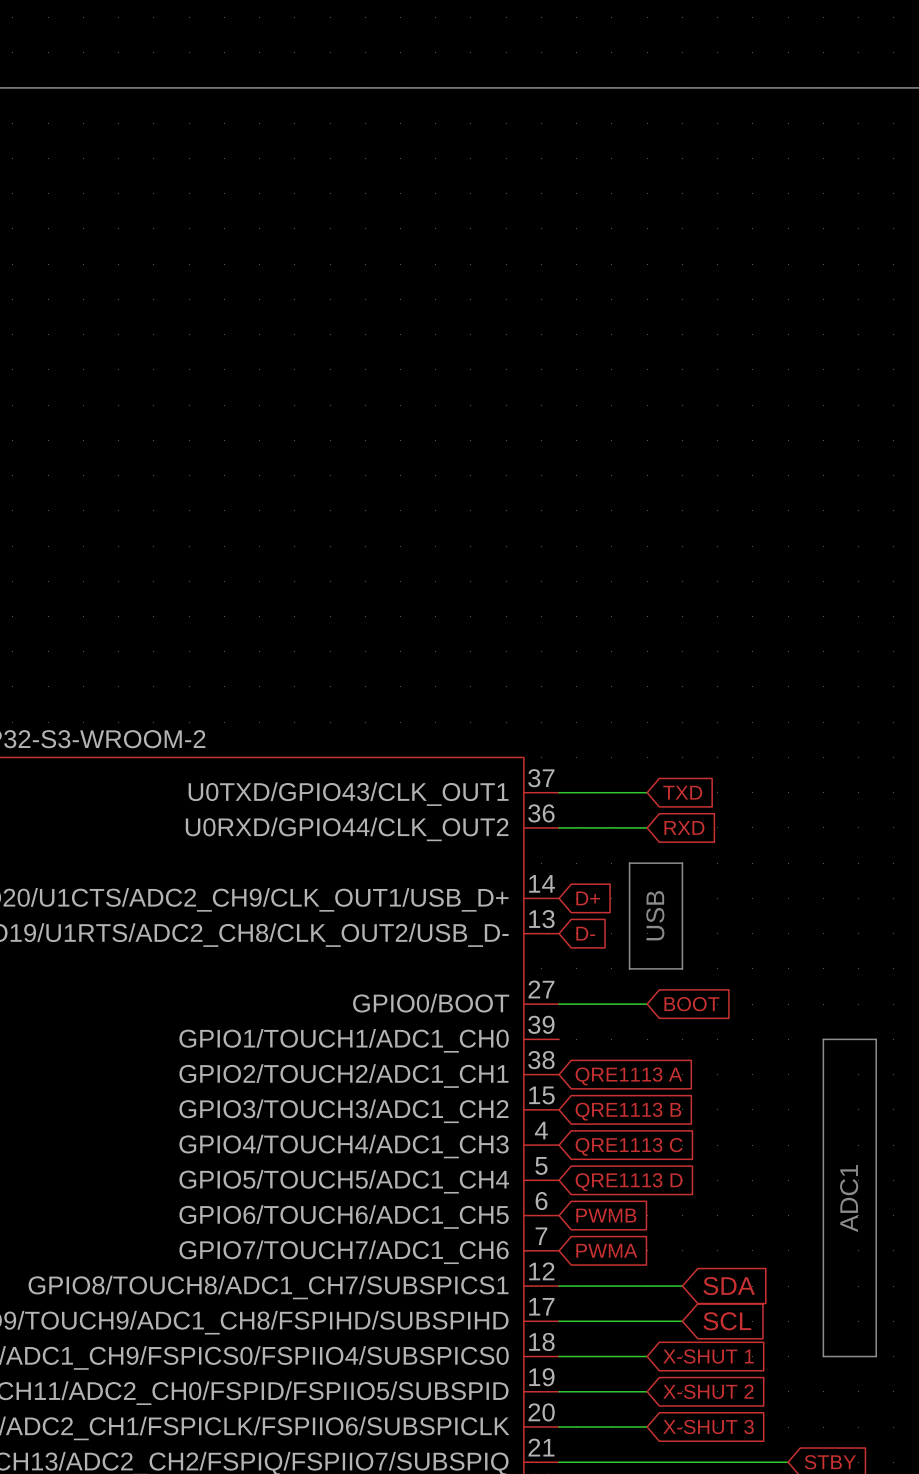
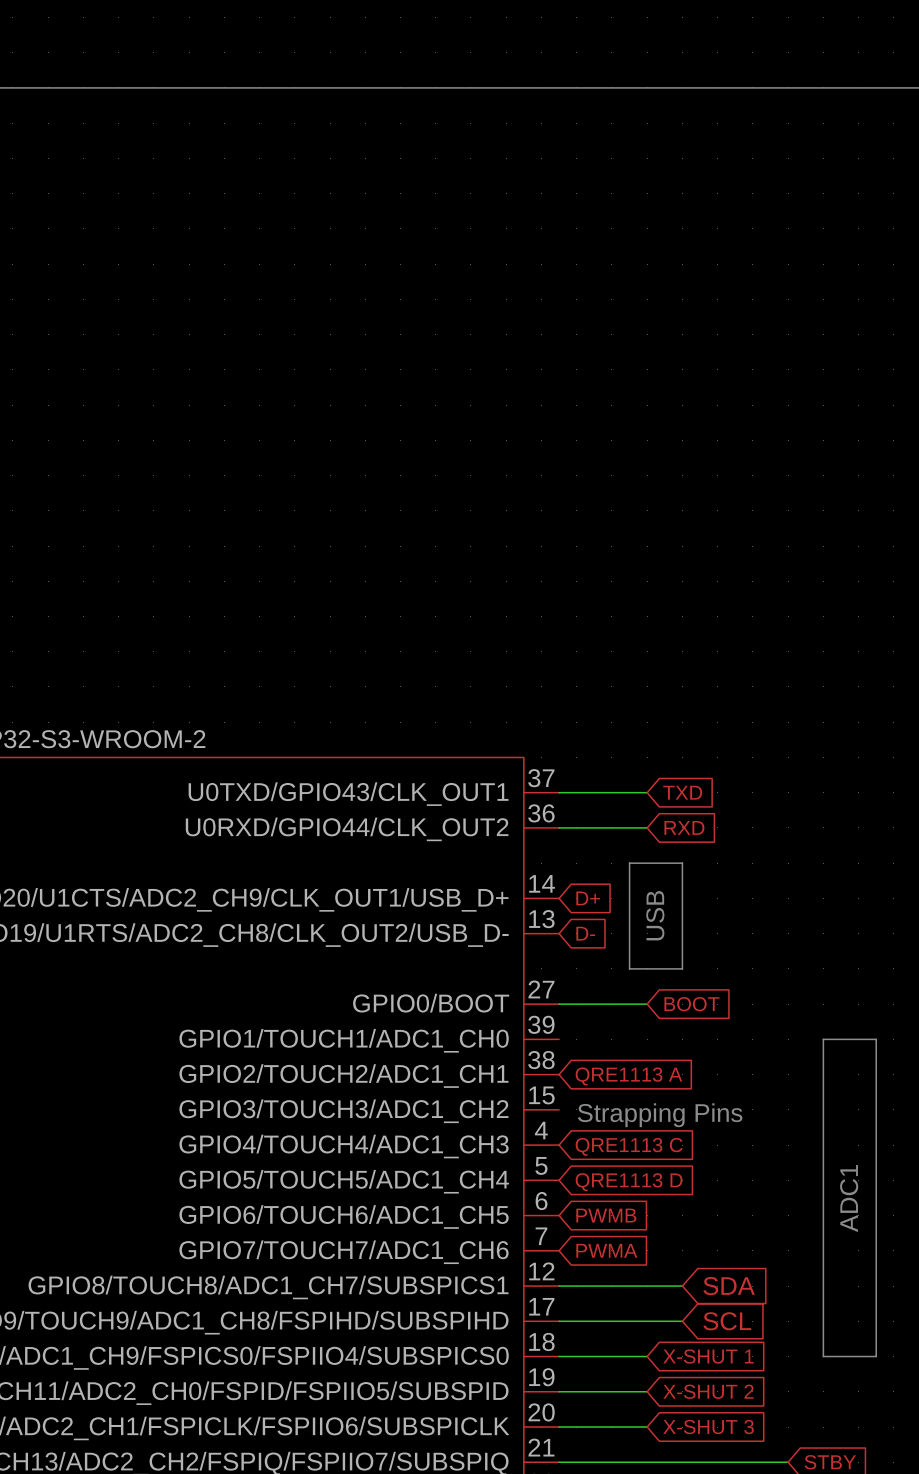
global label: QRE1113 B (628, 1111) -> none
text: none -> Strapping Pins (660, 1115)

